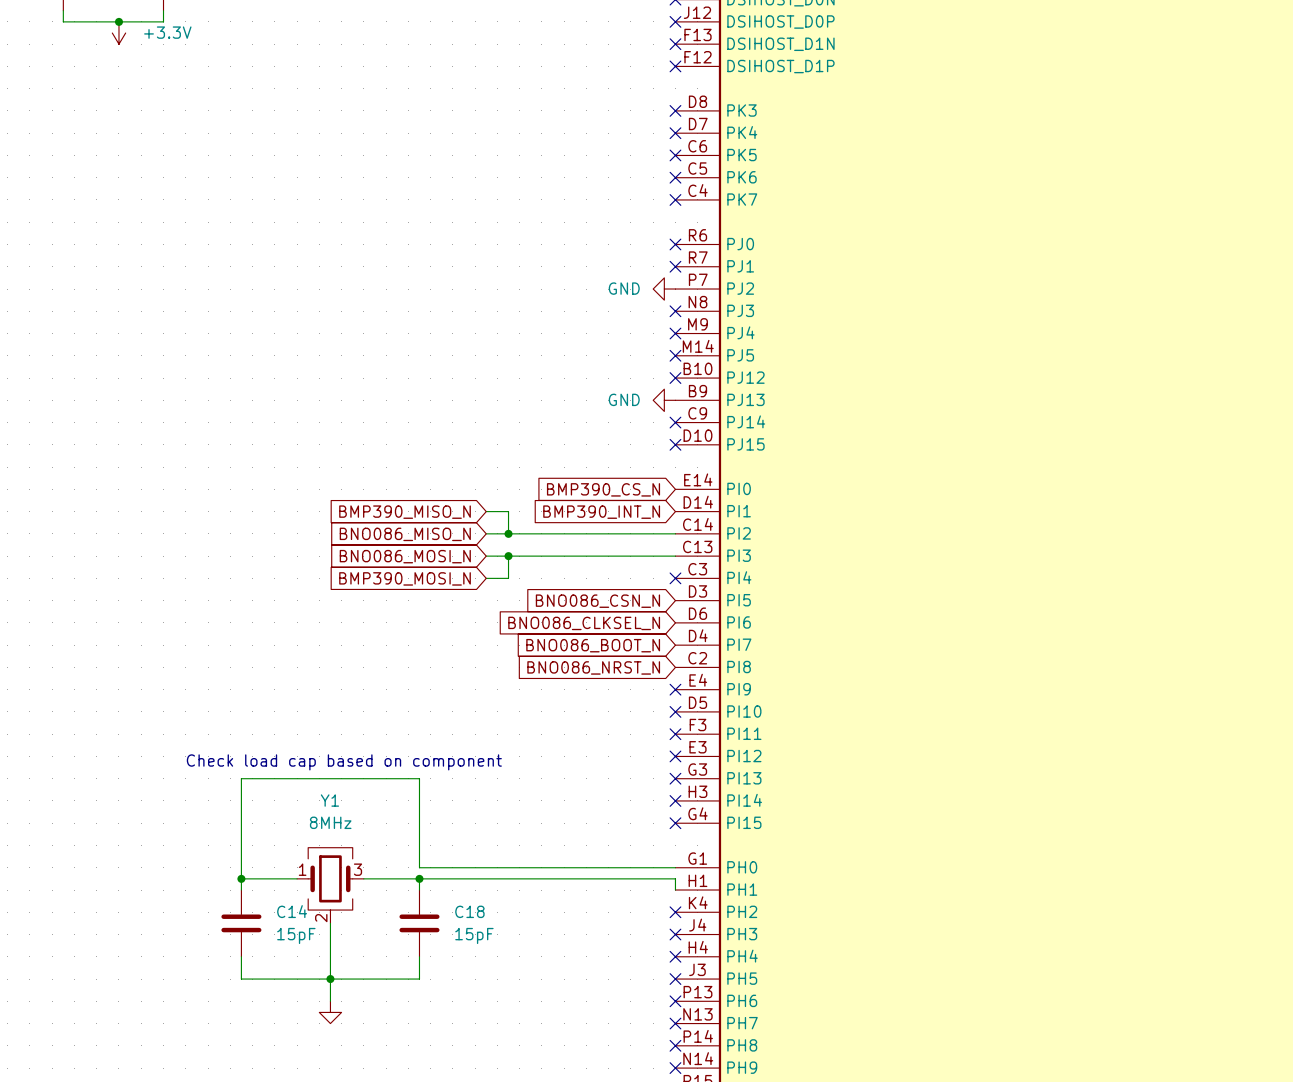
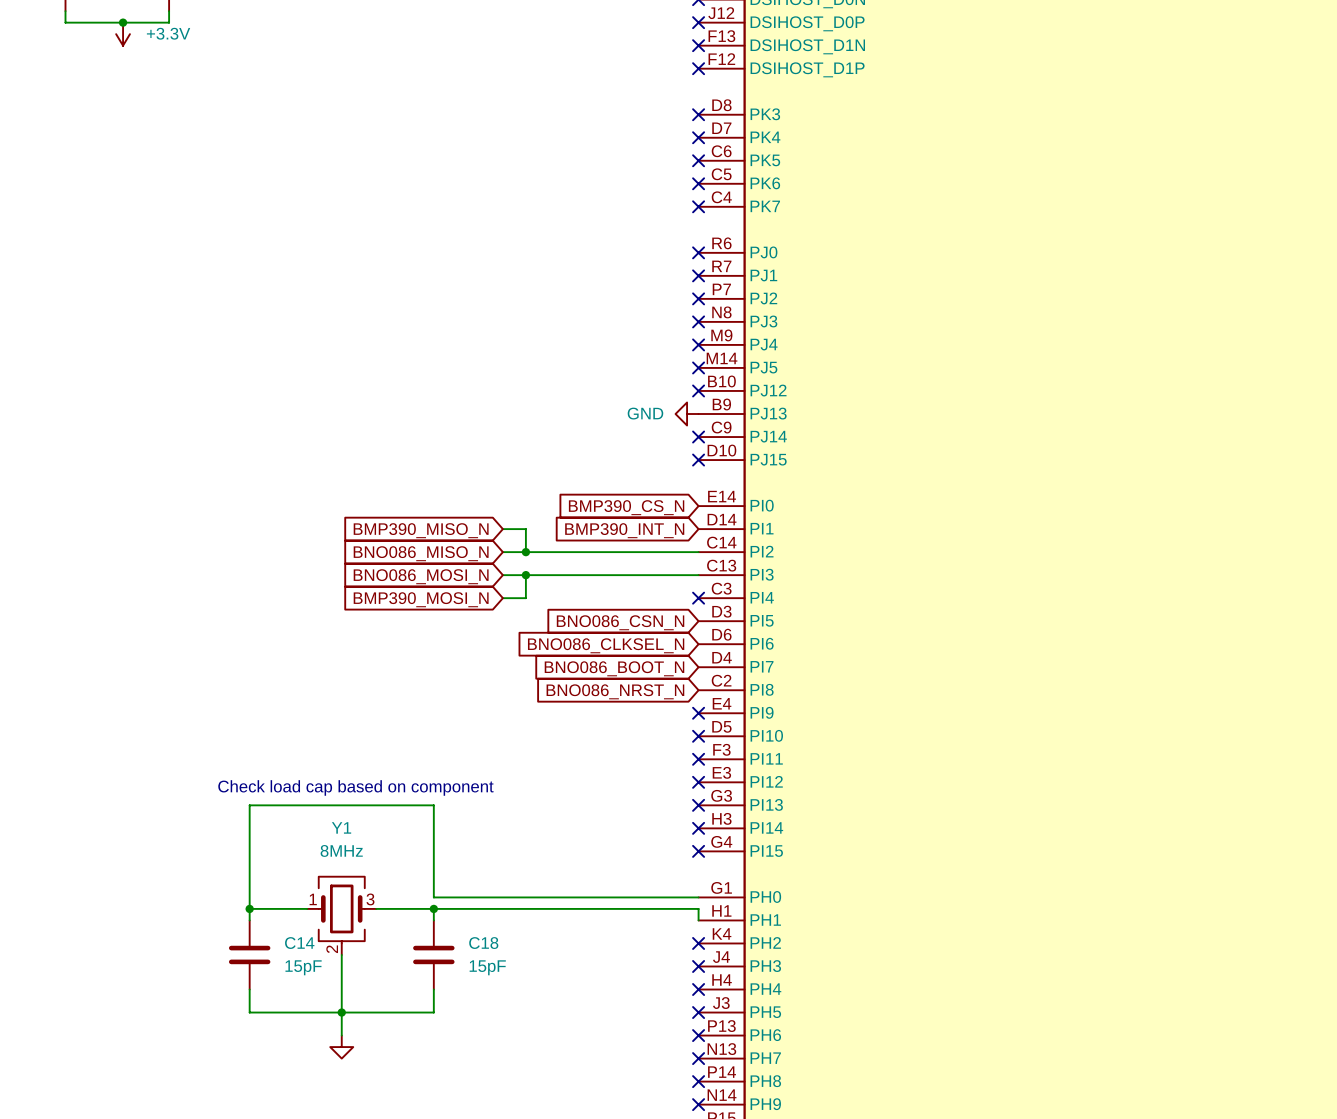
power symbol: GND (664, 289) -> none
no-connect mark: none -> (698, 298)

